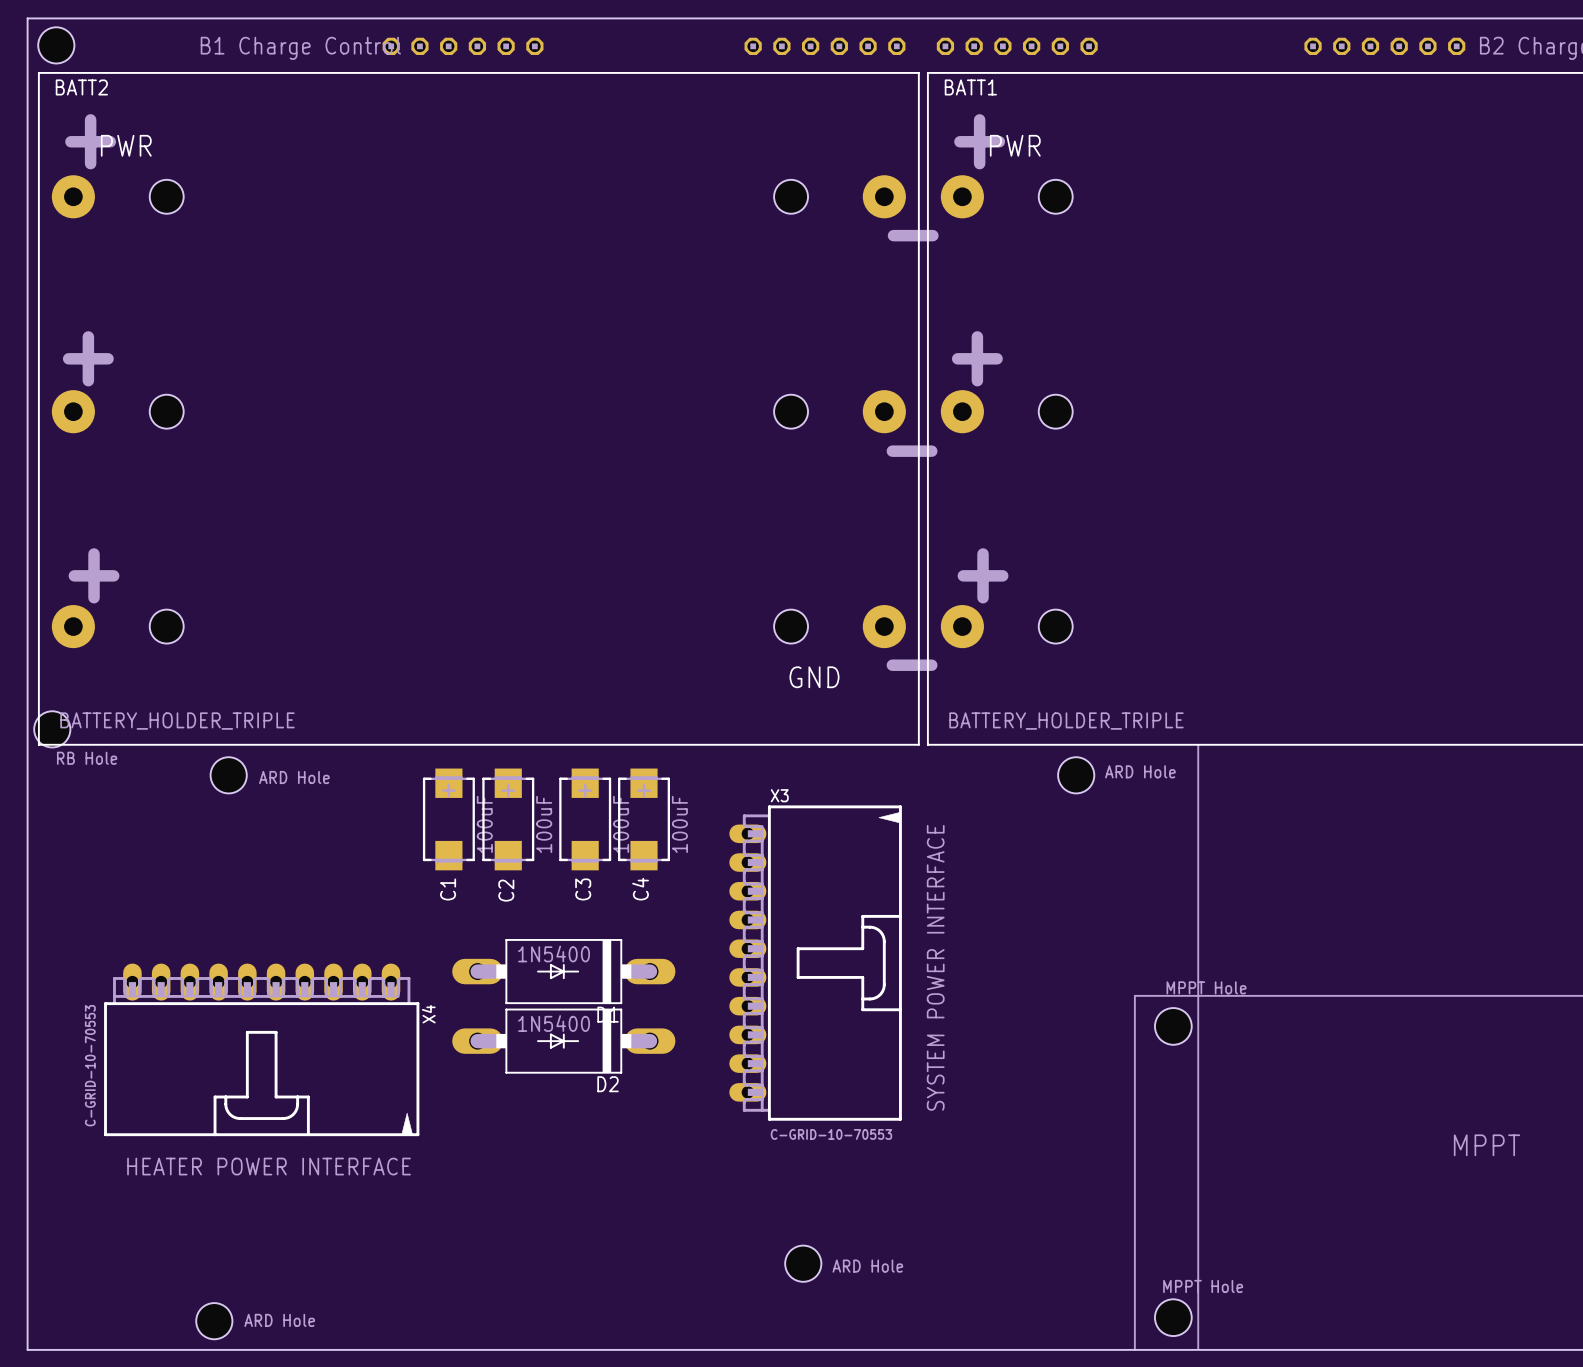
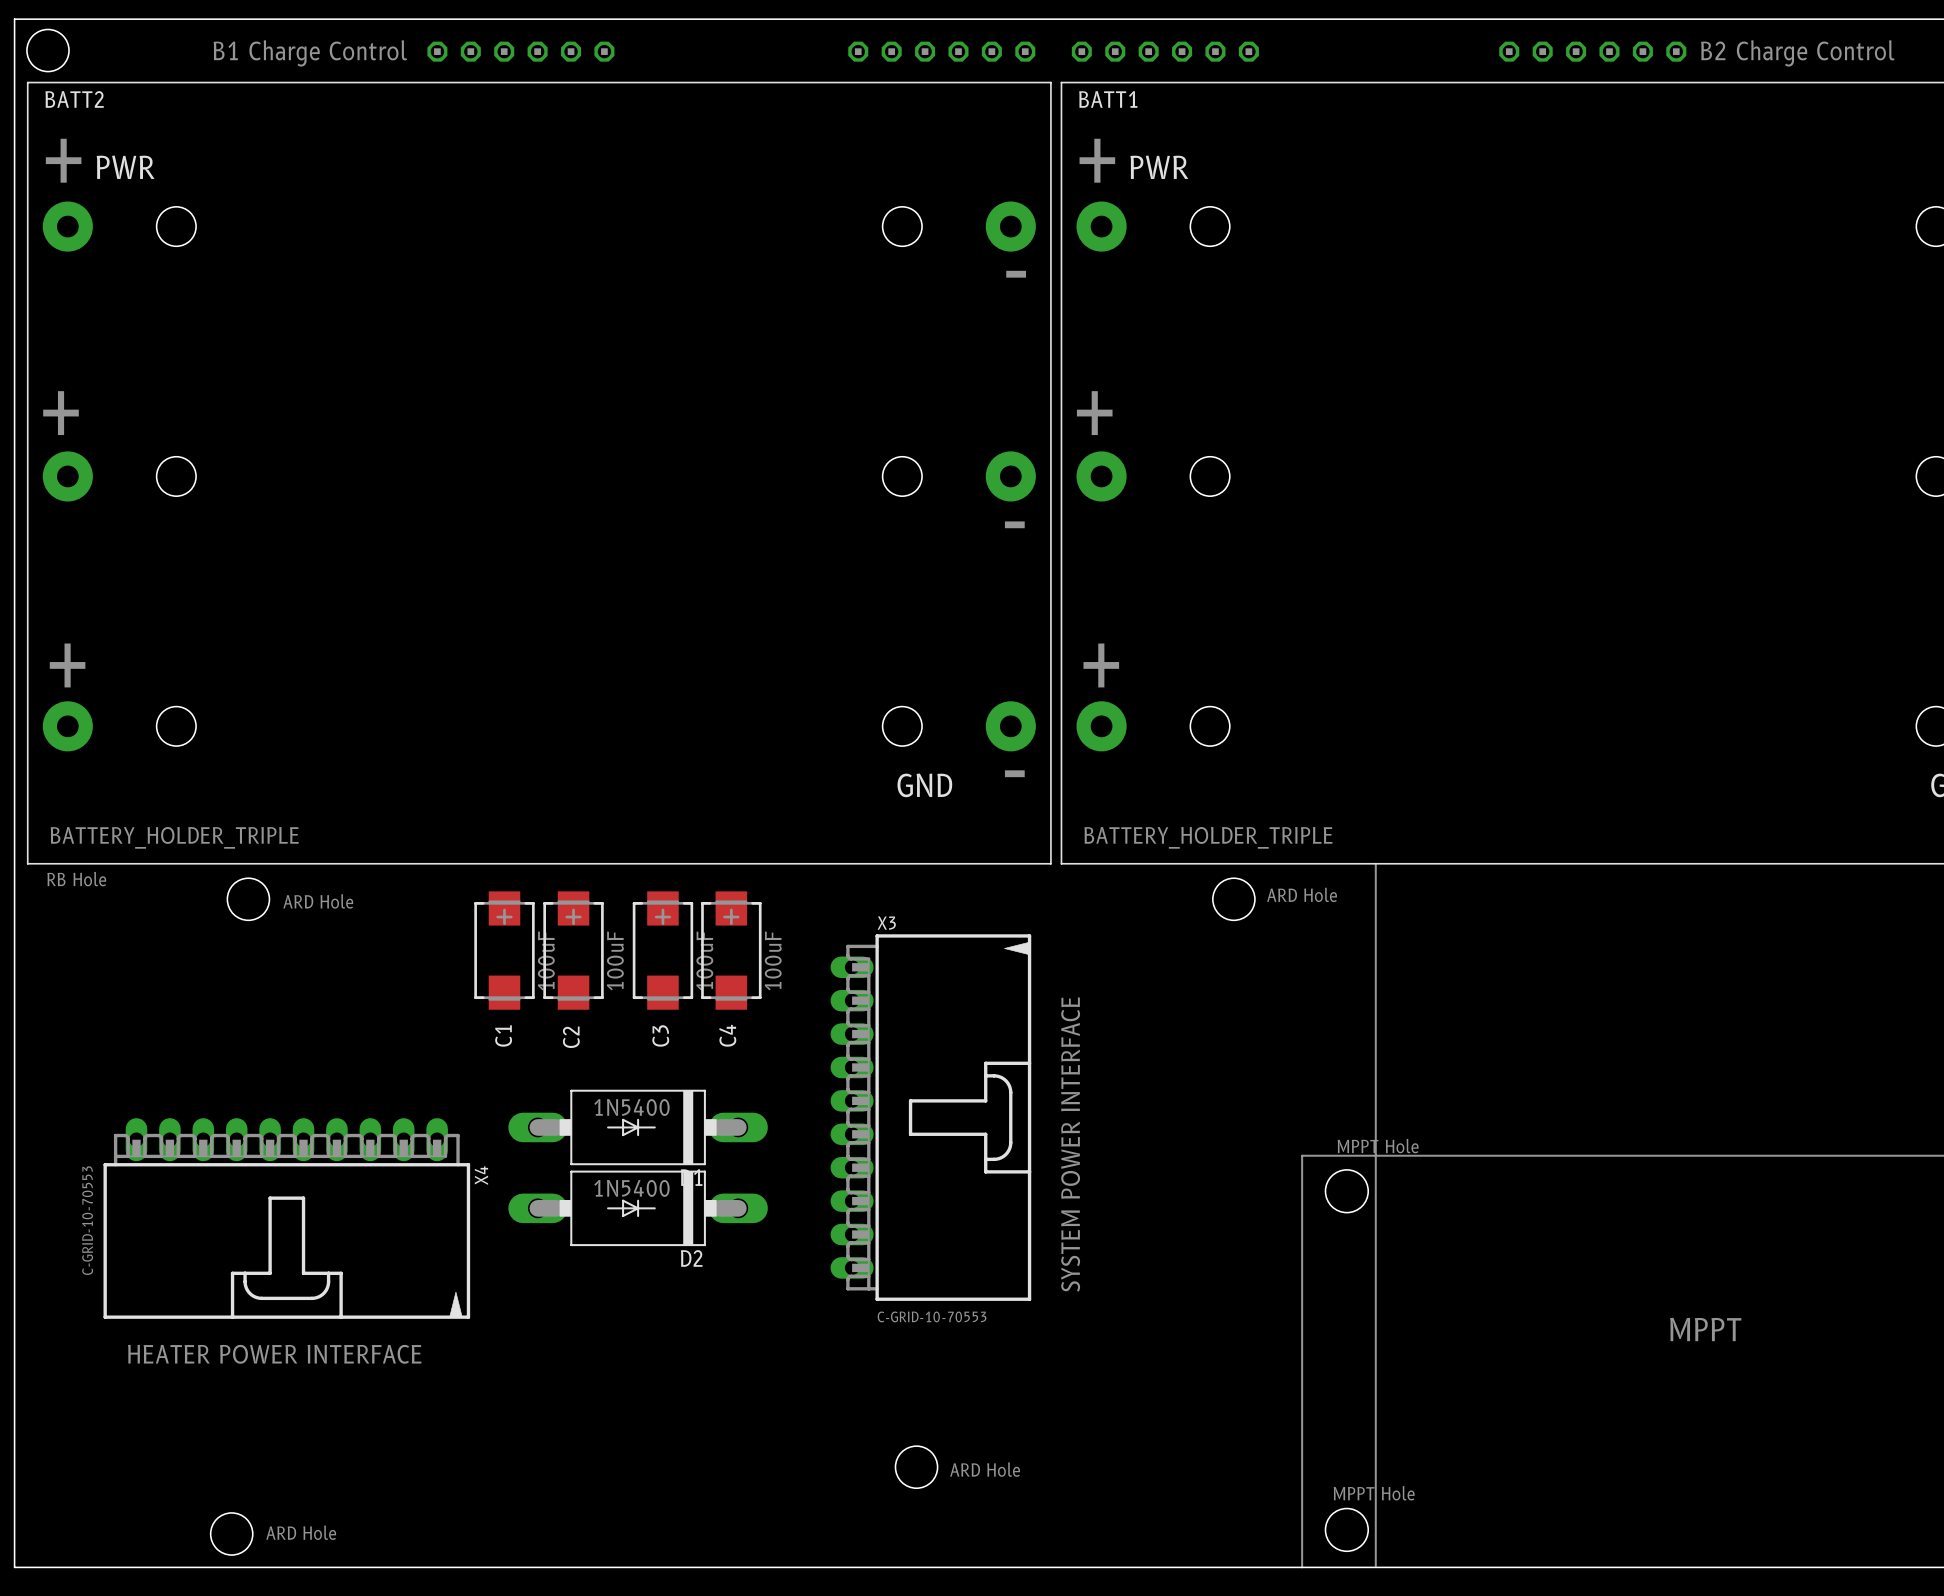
hole: (52, 729) -> none

